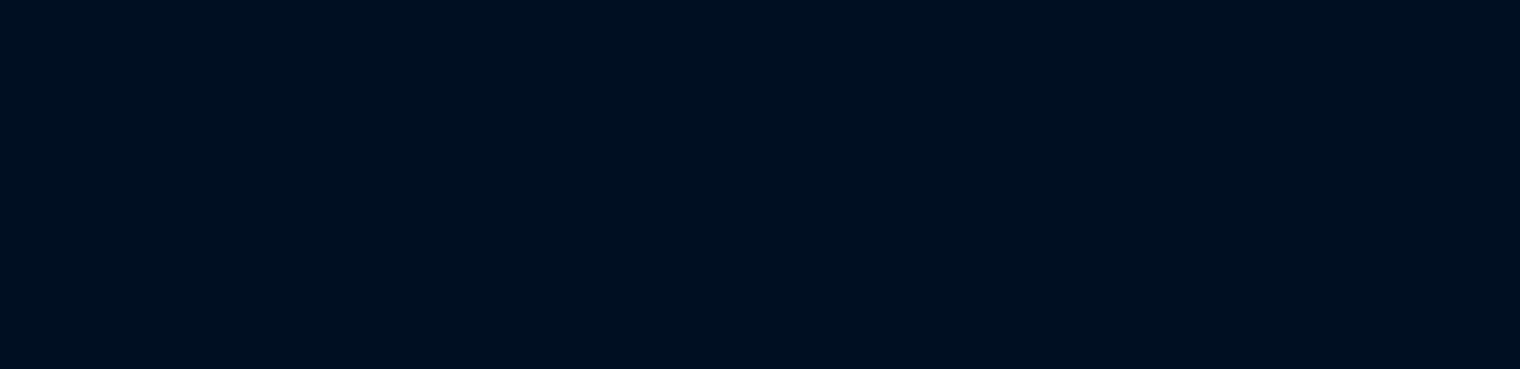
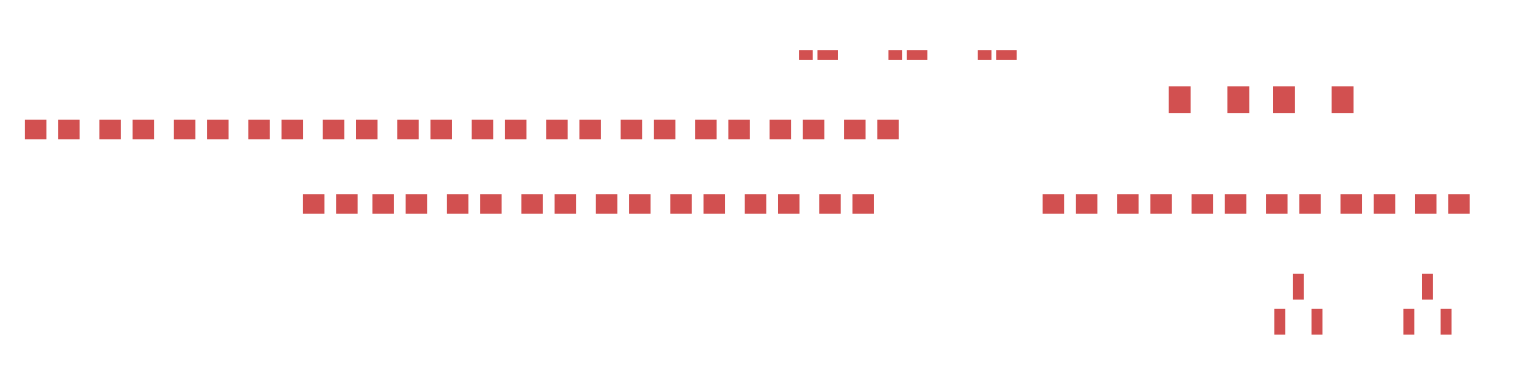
part: none -> (818, 55)
part: none -> (907, 55)
part: none -> (997, 55)
part: none -> (1209, 99)
part: none -> (1313, 99)
part: none -> (52, 129)
part: none -> (126, 129)
part: none -> (201, 129)
part: none -> (275, 129)
part: none -> (350, 129)
part: none -> (424, 129)
part: none -> (499, 129)
part: none -> (573, 129)
part: none -> (648, 129)
part: none -> (722, 129)
part: none -> (796, 129)
part: none -> (871, 129)
part: none -> (330, 203)
part: none -> (399, 203)
part: none -> (474, 203)
part: none -> (548, 203)
part: none -> (623, 203)
part: none -> (697, 203)
part: none -> (772, 203)
part: none -> (846, 203)
part: none -> (1070, 203)
part: none -> (1144, 203)
part: none -> (1218, 203)
part: none -> (1293, 203)
part: none -> (1367, 203)
part: none -> (1442, 203)
part: none -> (1298, 304)
part: none -> (1427, 304)

